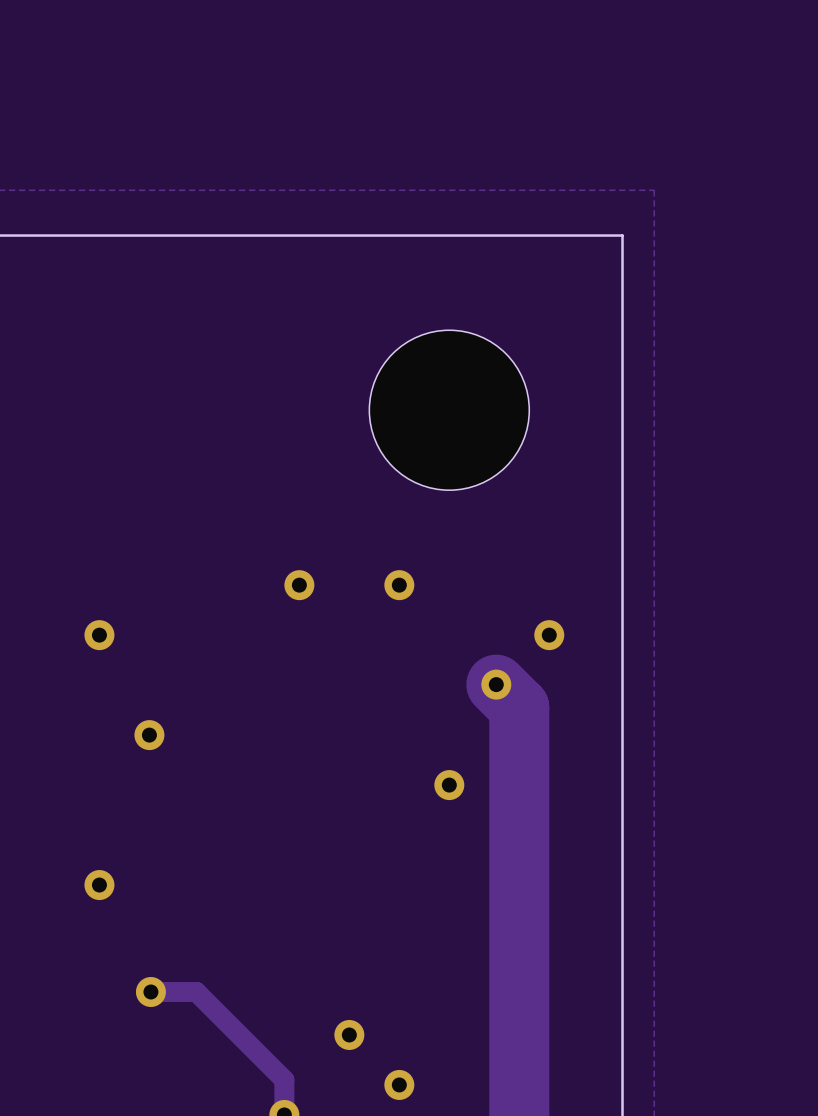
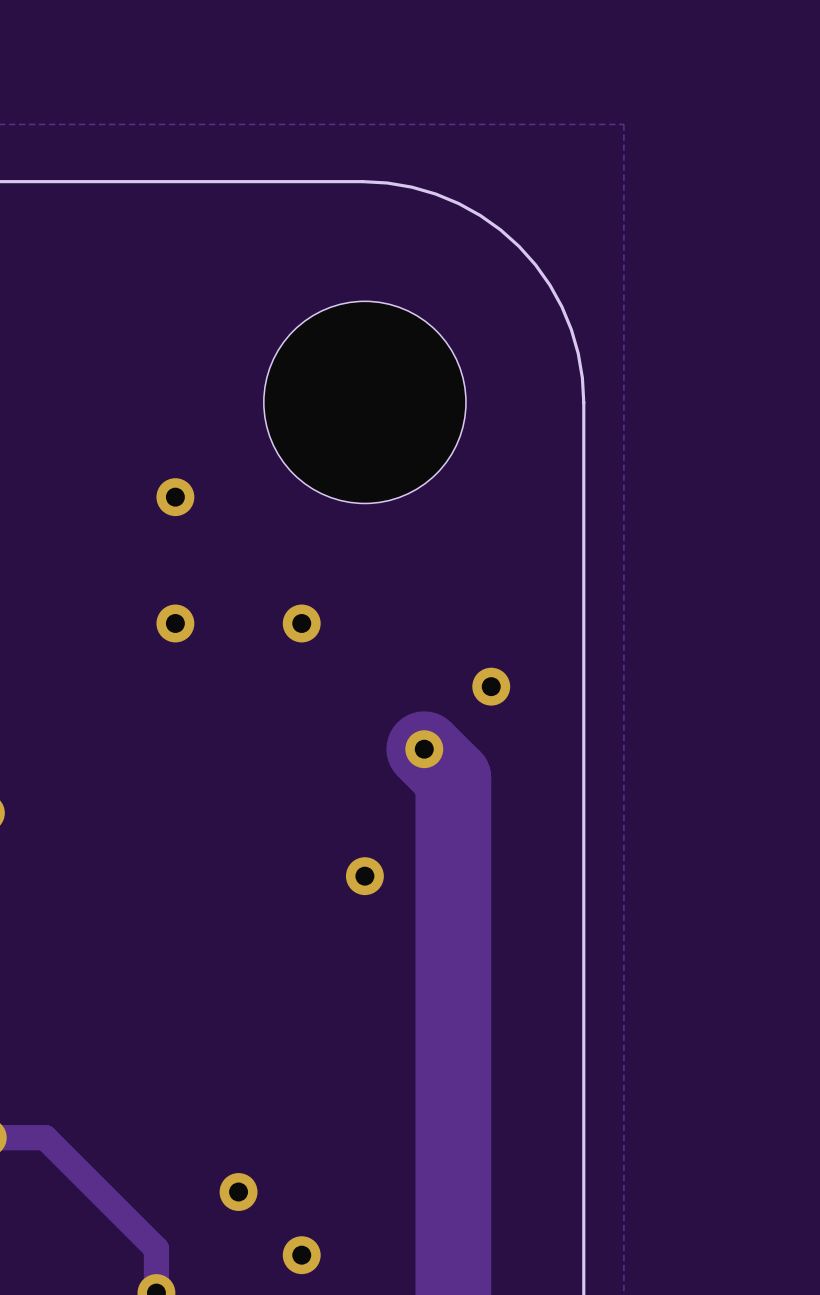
board edge: (447, 235) (622, 235) (622, 410) -> (362, 181) (411, 187) (458, 203) (480, 215) (519, 246) (549, 285) (571, 329) (578, 353) (583, 402)
via: none -> (175, 497)

